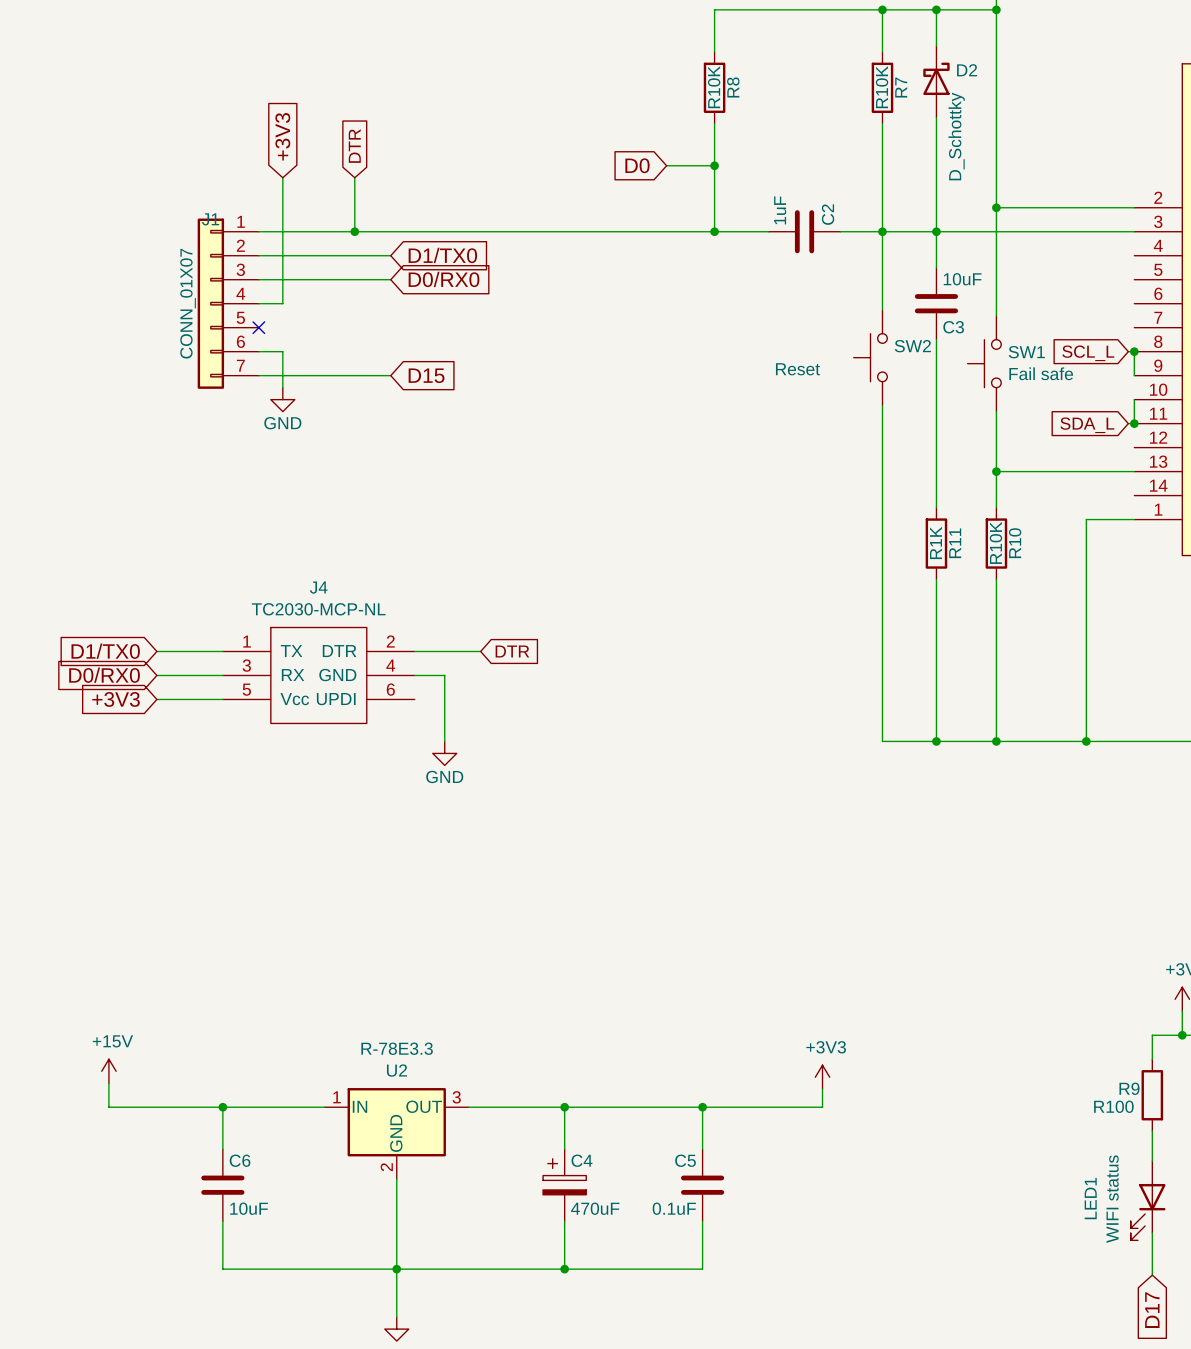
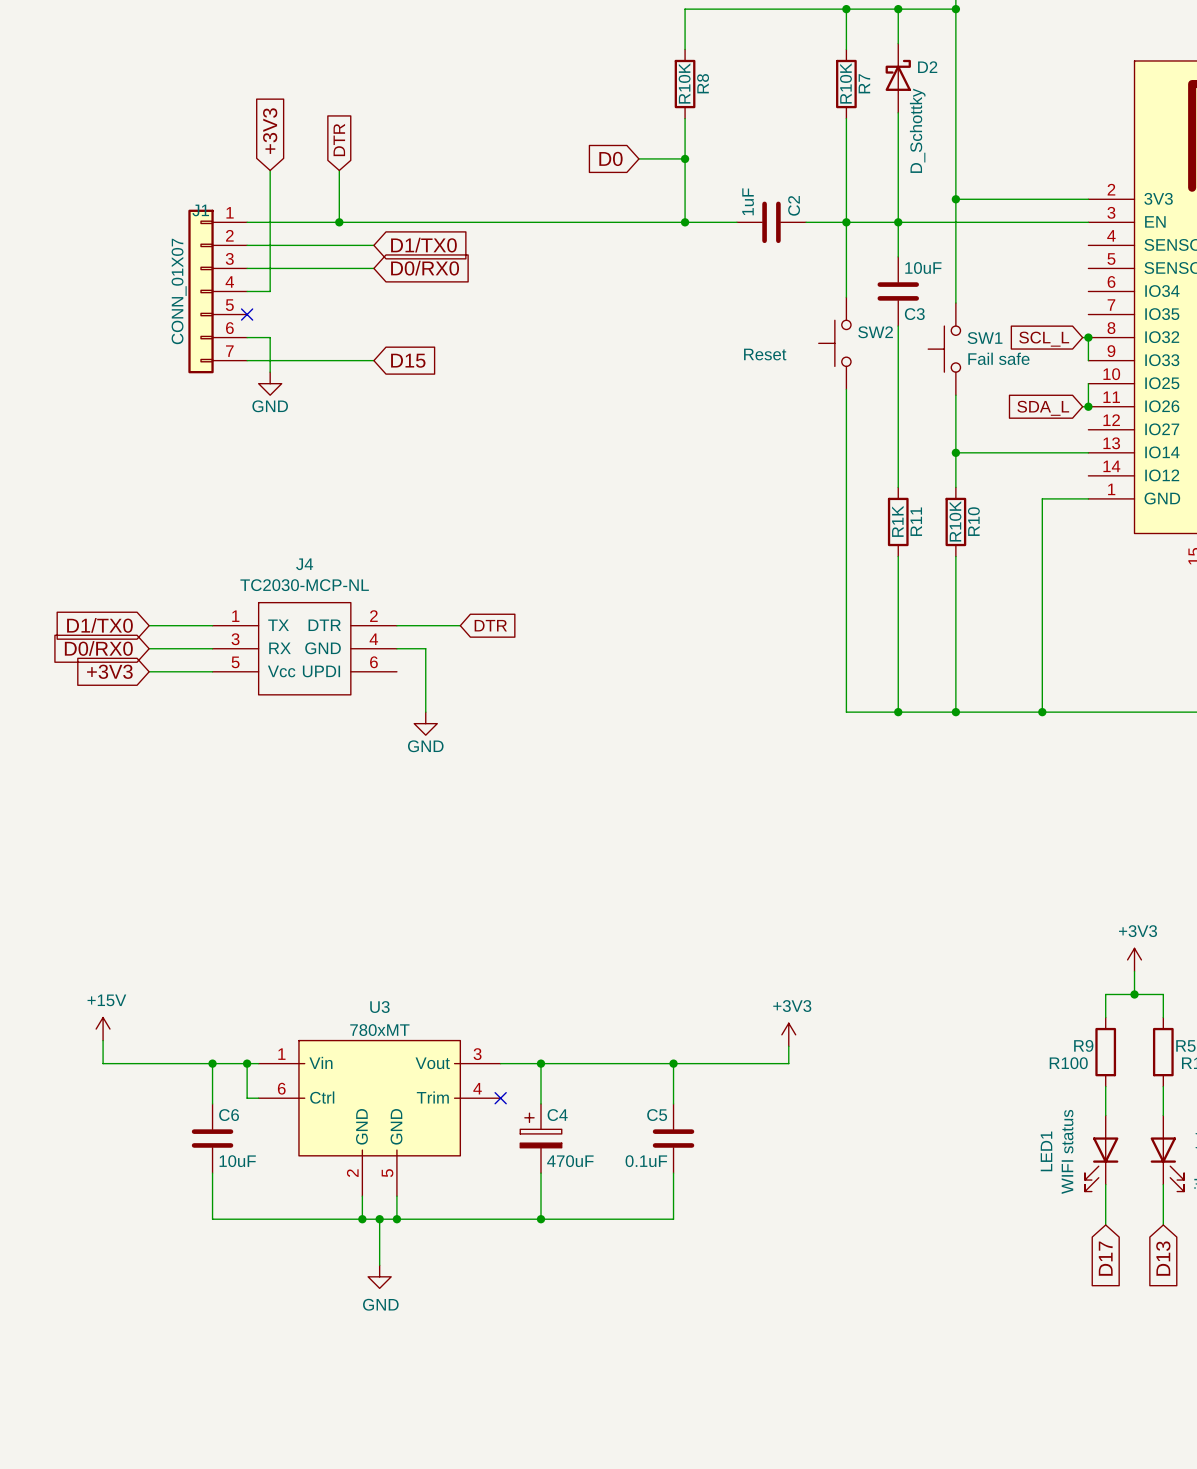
wire: none -> (247, 1063) (247, 1098) (258, 1098)
junction: none -> (247, 1063)
R-78E3.3: U2 (396, 1133) -> none
no-connect mark: none -> (500, 1098)
U3: none -> 780xMT (379, 1118)
wire: (396, 1179) (396, 1269) -> none
wire: none -> (362, 1196) (362, 1219)
wire: none -> (396, 1196) (396, 1219)
junction: none -> (362, 1219)
junction: none -> (396, 1219)

